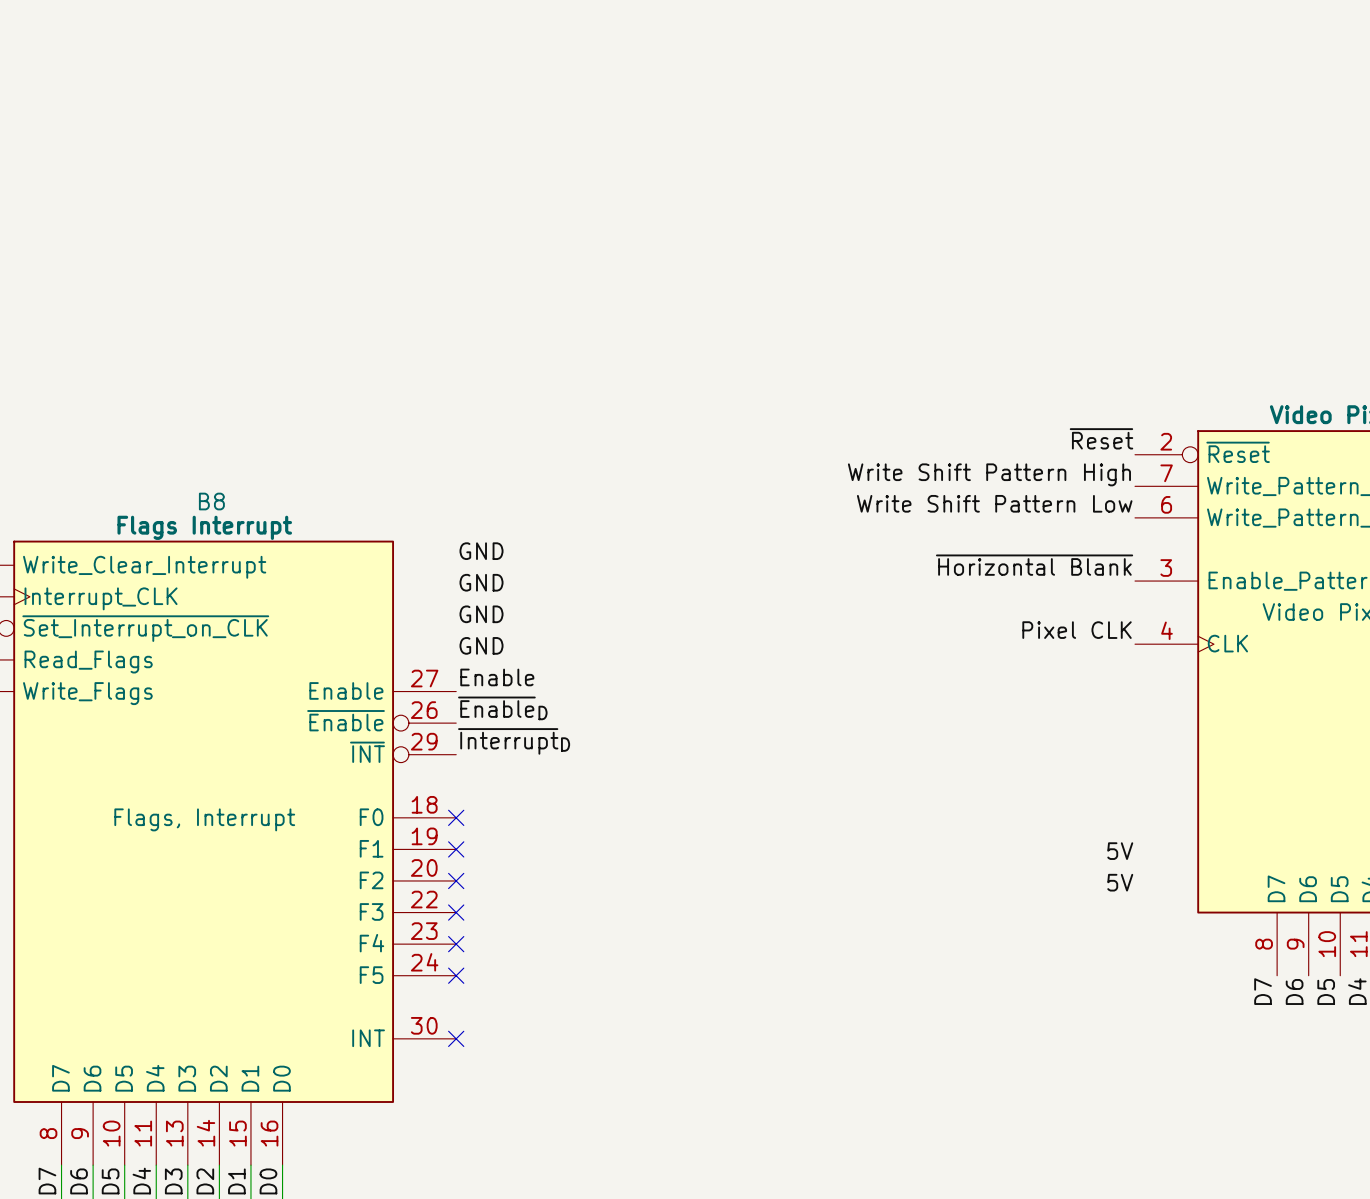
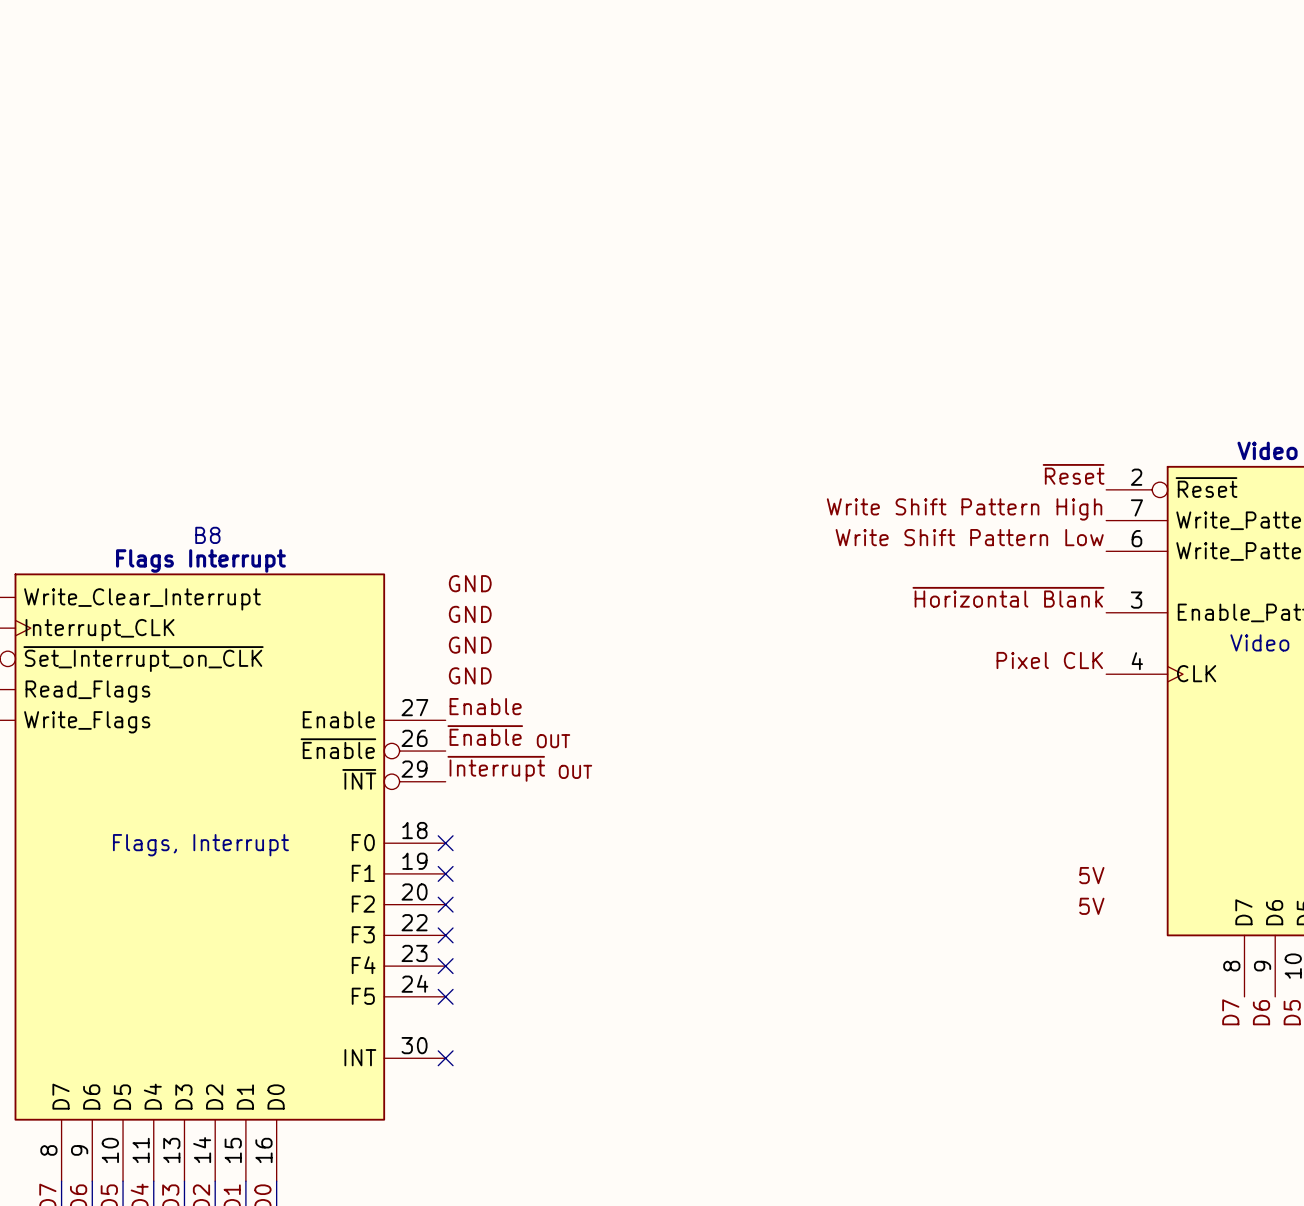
label: ~{Enable}D (502, 708) -> ~{Enable} OUT (508, 736)
label: ~{Interrupt}D (514, 741) -> ~{Interrupt} OUT (519, 768)

